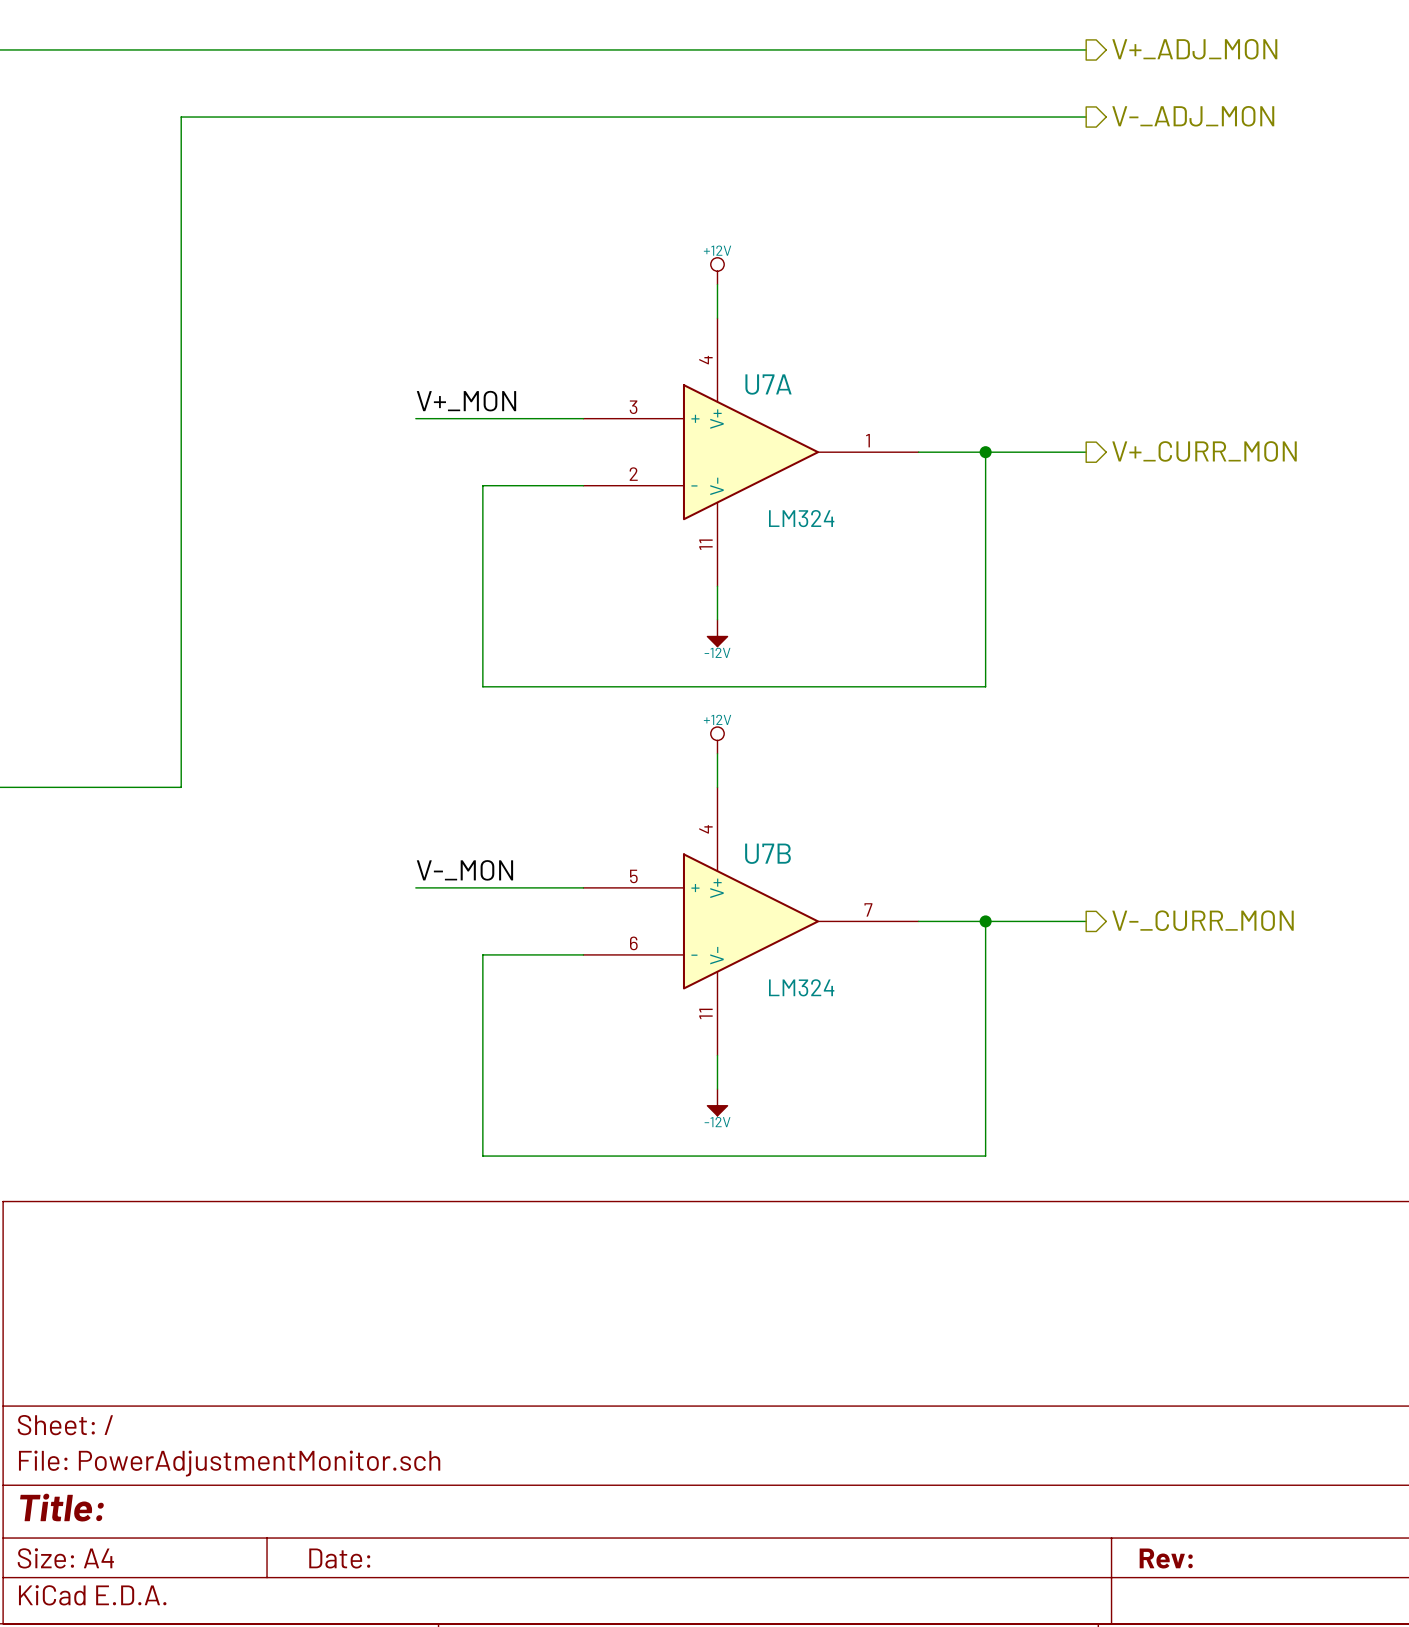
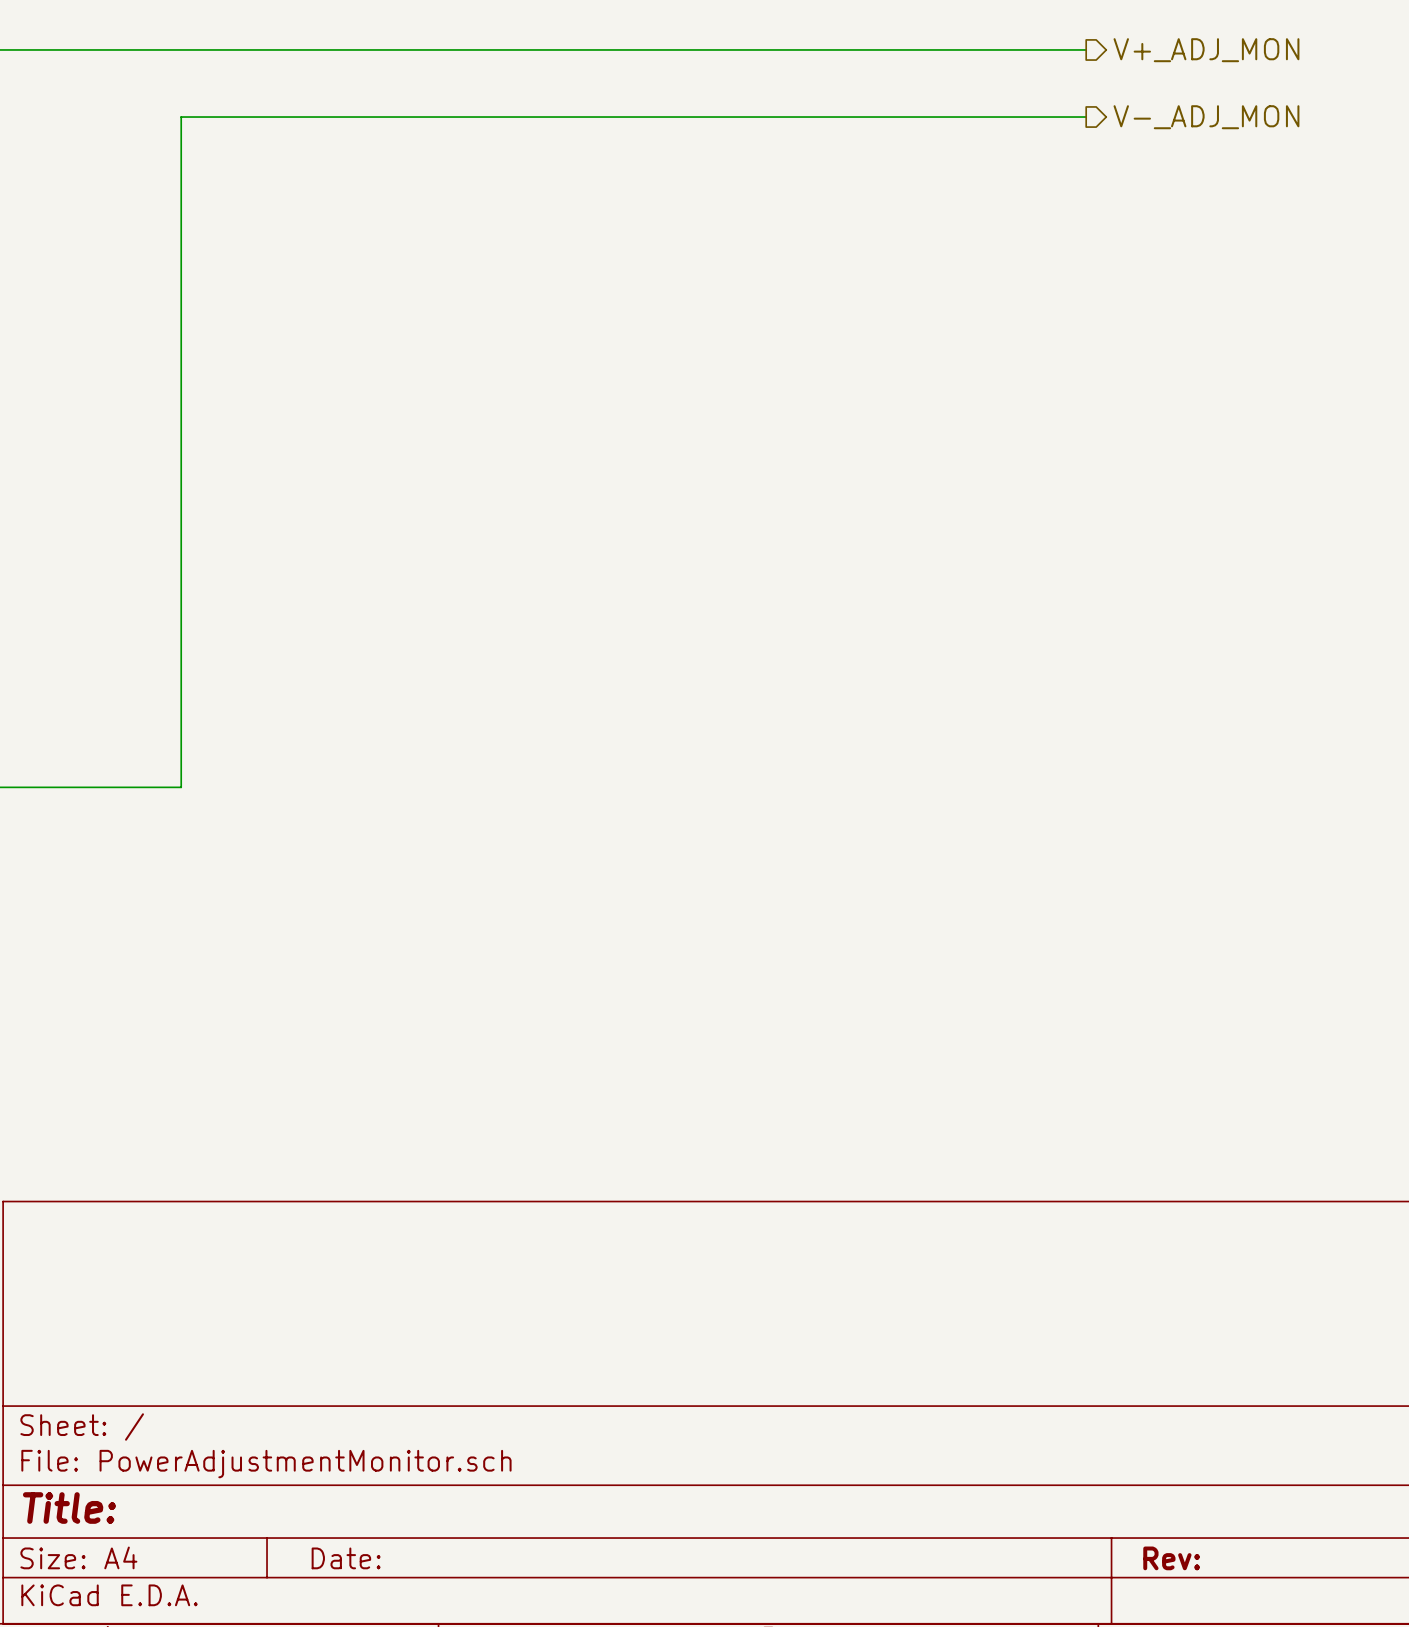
power symbol: +12V (717, 271) -> none
wire: (717, 284) (717, 318) -> none
label: V+_MON (466, 401) -> none
wire: (415, 418) (583, 418) -> none
hierarchical label: V+_CURR_MON (1204, 451) -> none
U7A: LM324 (751, 452) -> none
wire: (918, 452) (1086, 452) -> none
wire: (985, 452) (985, 686) (482, 686) (482, 485) (583, 485) -> none
junction: (985, 452) -> none
wire: (717, 586) (717, 619) -> none
power symbol: -12V (717, 633) -> none
power symbol: +12V (717, 740) -> none
wire: (717, 753) (717, 787) -> none
label: V-_MON (464, 870) -> none
wire: (415, 887) (583, 887) -> none
hierarchical label: V-_CURR_MON (1203, 920) -> none
U7B: LM324 (751, 921) -> none
wire: (918, 921) (1086, 921) -> none
wire: (985, 921) (985, 1156) (482, 1156) (482, 954) (583, 954) -> none
junction: (985, 921) -> none
wire: (717, 1055) (717, 1089) -> none
power symbol: -12V (717, 1102) -> none

